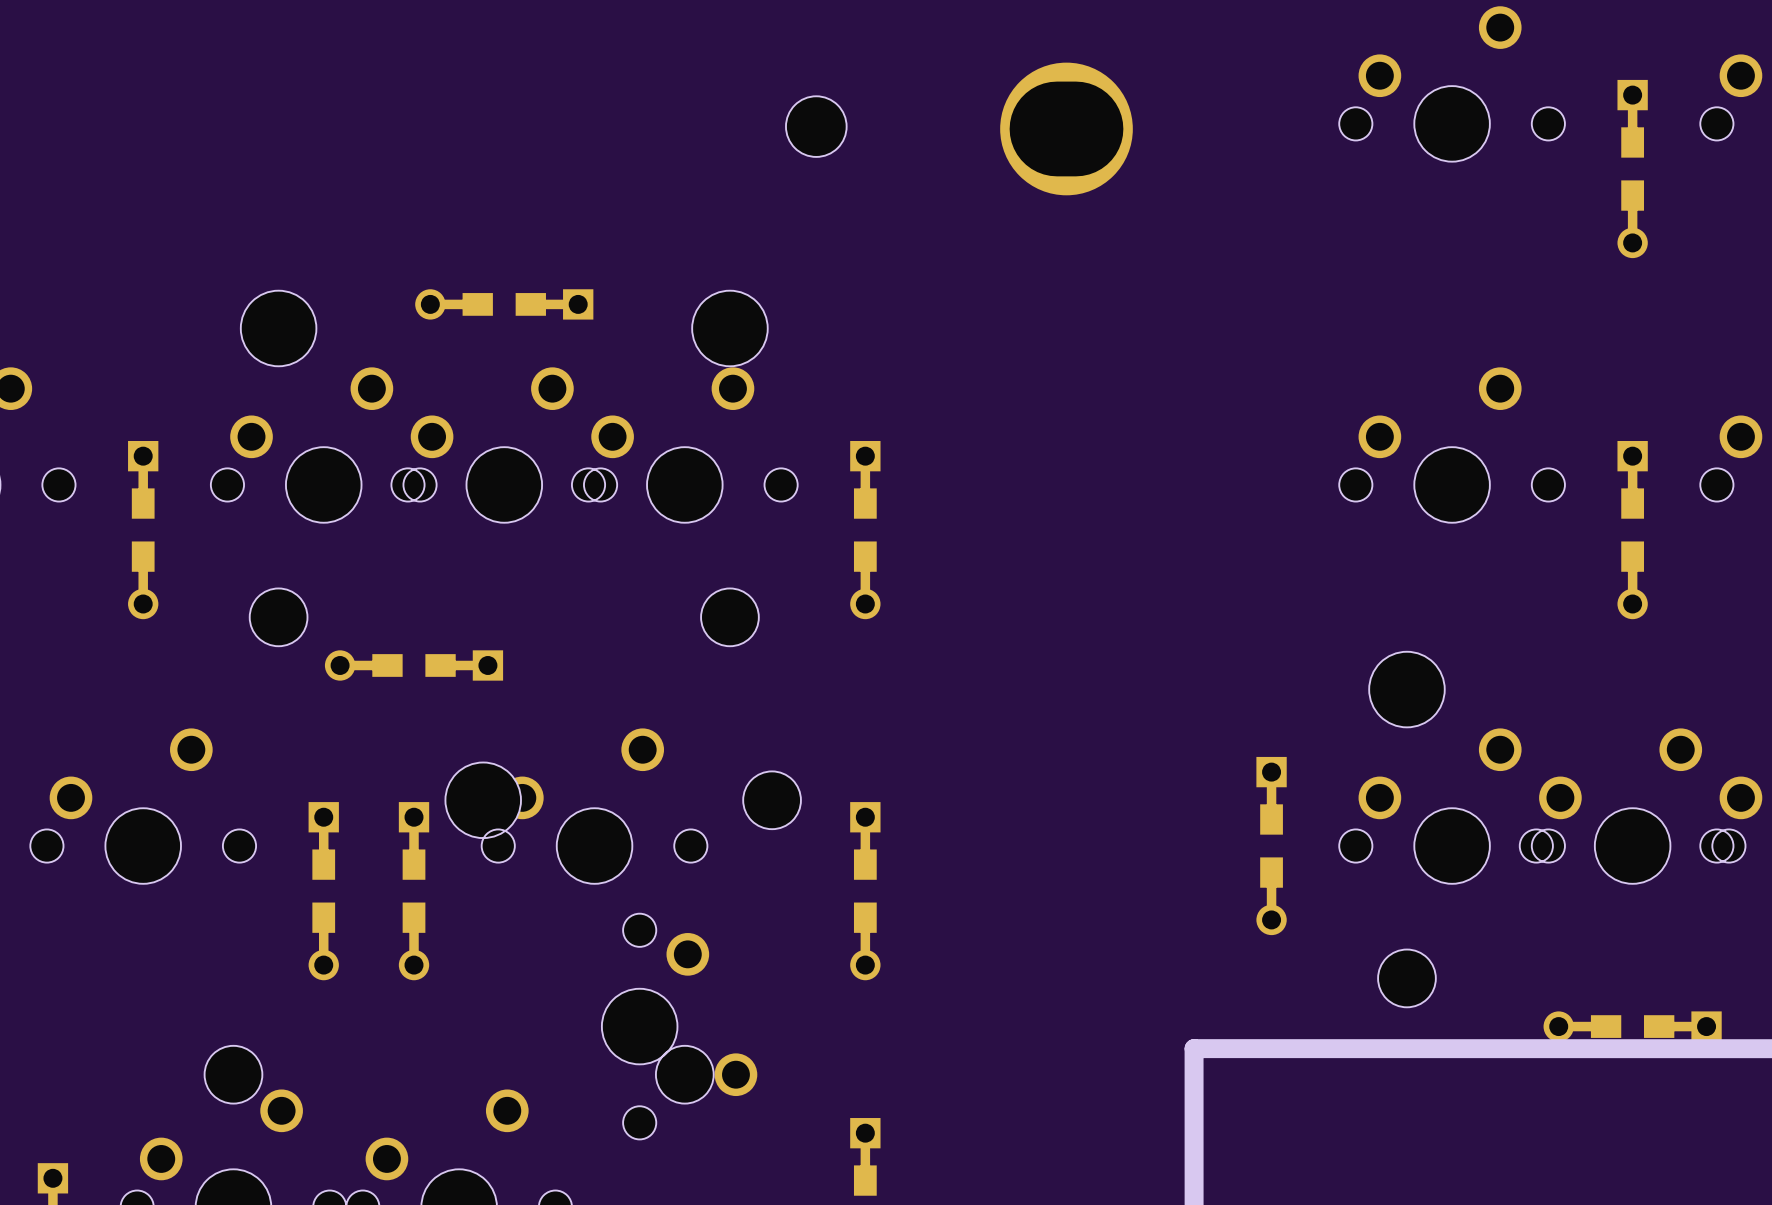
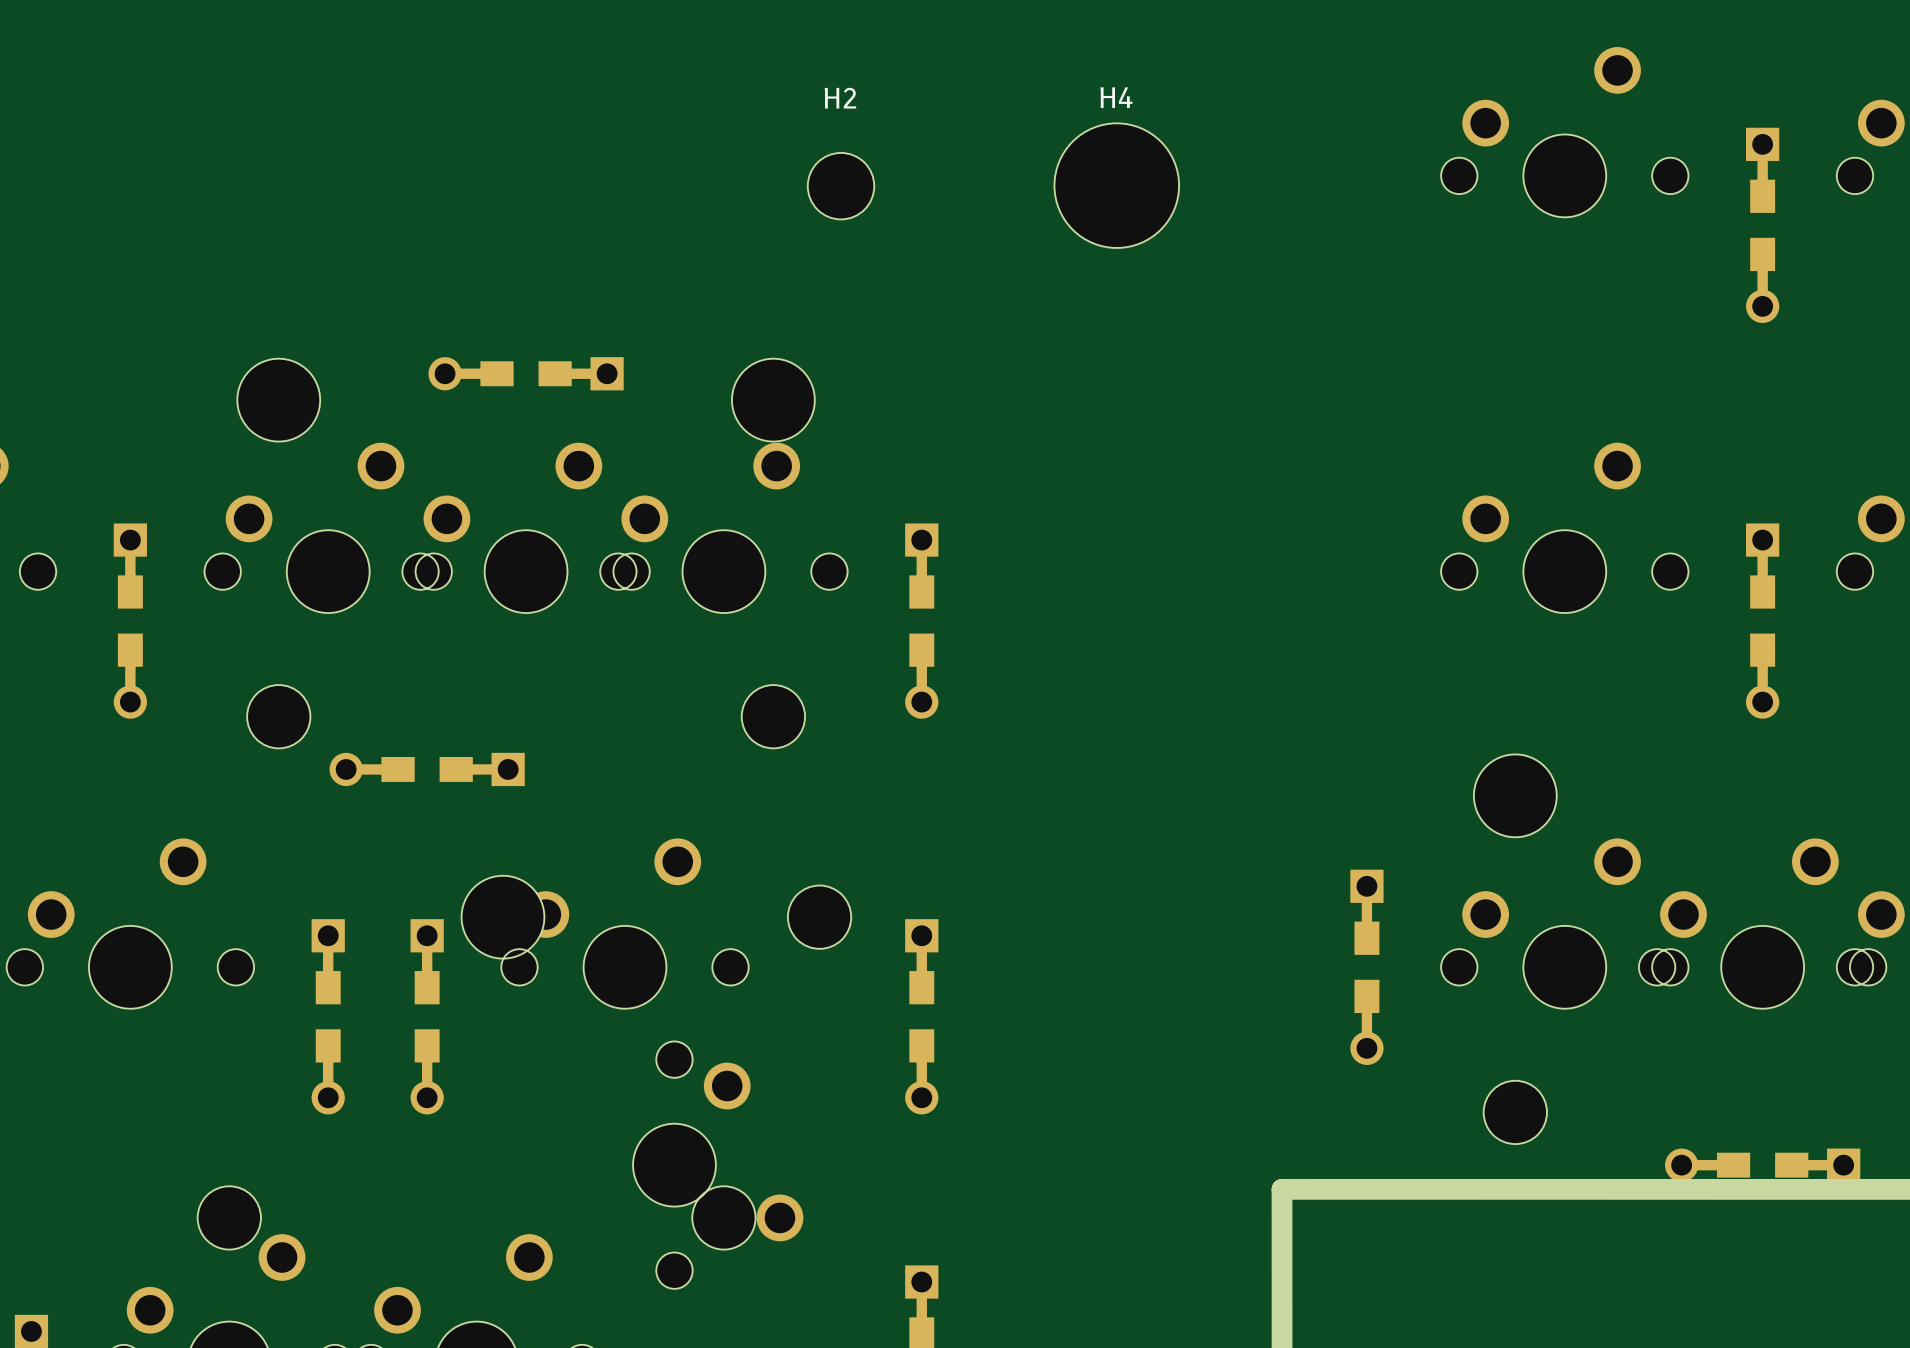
part: (816, 126) -> none
part: (1066, 128) -> none
H4: none -> (1116, 185)
H2: none -> (841, 186)

